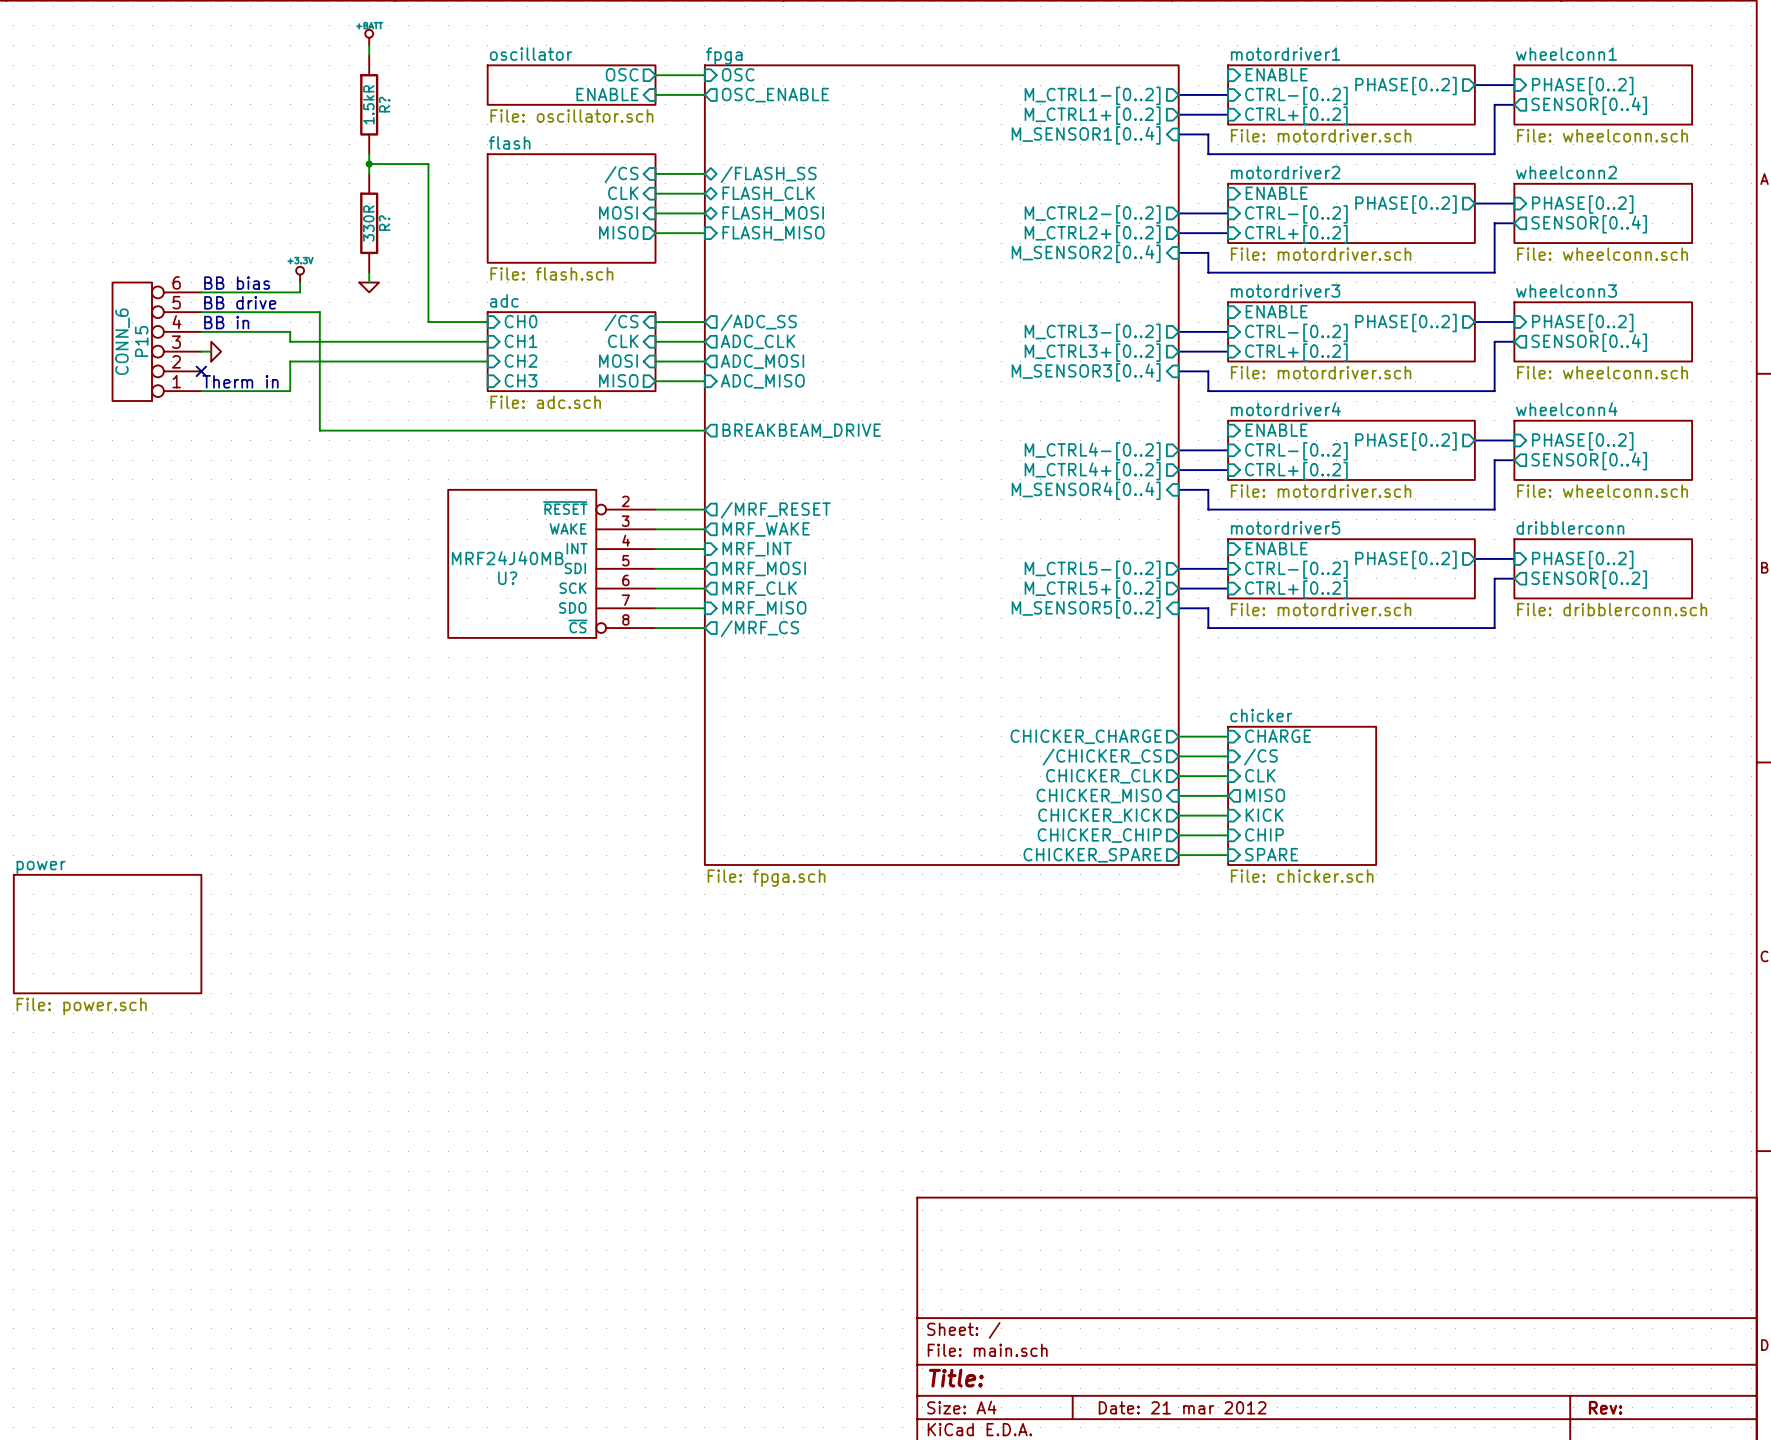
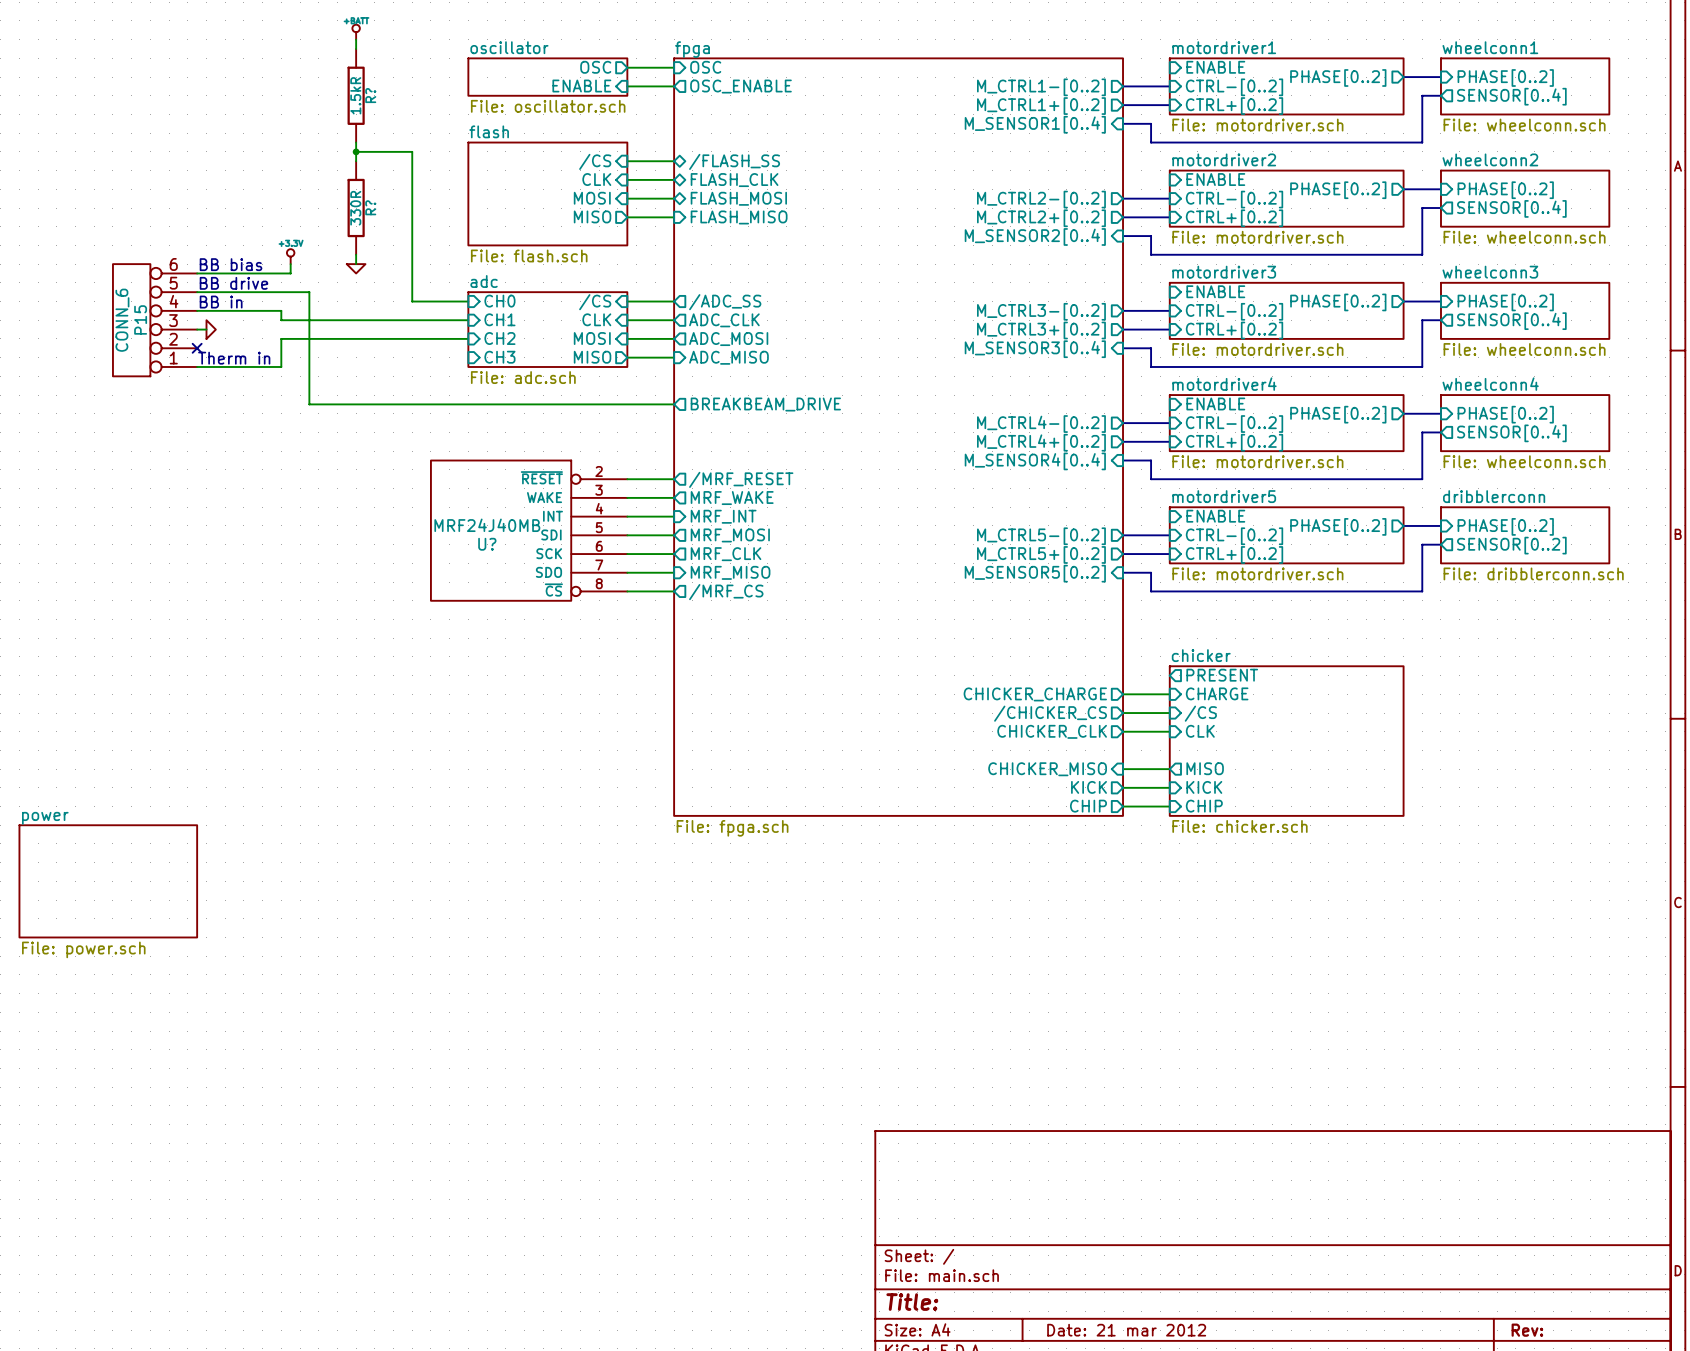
sheet pin: none -> PRESENT (1222, 675)
sheet chicker: none -> File: chicker.sch (1286, 741)
wire: (1178, 795) (1228, 795) -> none
sheet pin: MISO (1265, 795) -> none
sheet chicker: File: chicker.sch (1302, 795) -> none
sheet pin: CHICKER_MISO (1099, 796) -> none
sheet pin shape: output (1099, 815) -> input (1047, 769)
sheet pin: CHICKER_KICK (1099, 815) -> CHICKER_MISO (1047, 769)
sheet pin shape: input (1264, 815) -> output (1205, 768)
sheet pin: KICK (1264, 815) -> MISO (1205, 768)
sheet pin: CHIP (1264, 834) -> KICK (1204, 787)
sheet pin: CHICKER_CHIP (1099, 835) -> KICK (1089, 787)
sheet pin: SPARE (1271, 854) -> CHIP (1204, 806)
sheet pin: CHICKER_SPARE (1092, 855) -> CHIP (1088, 806)

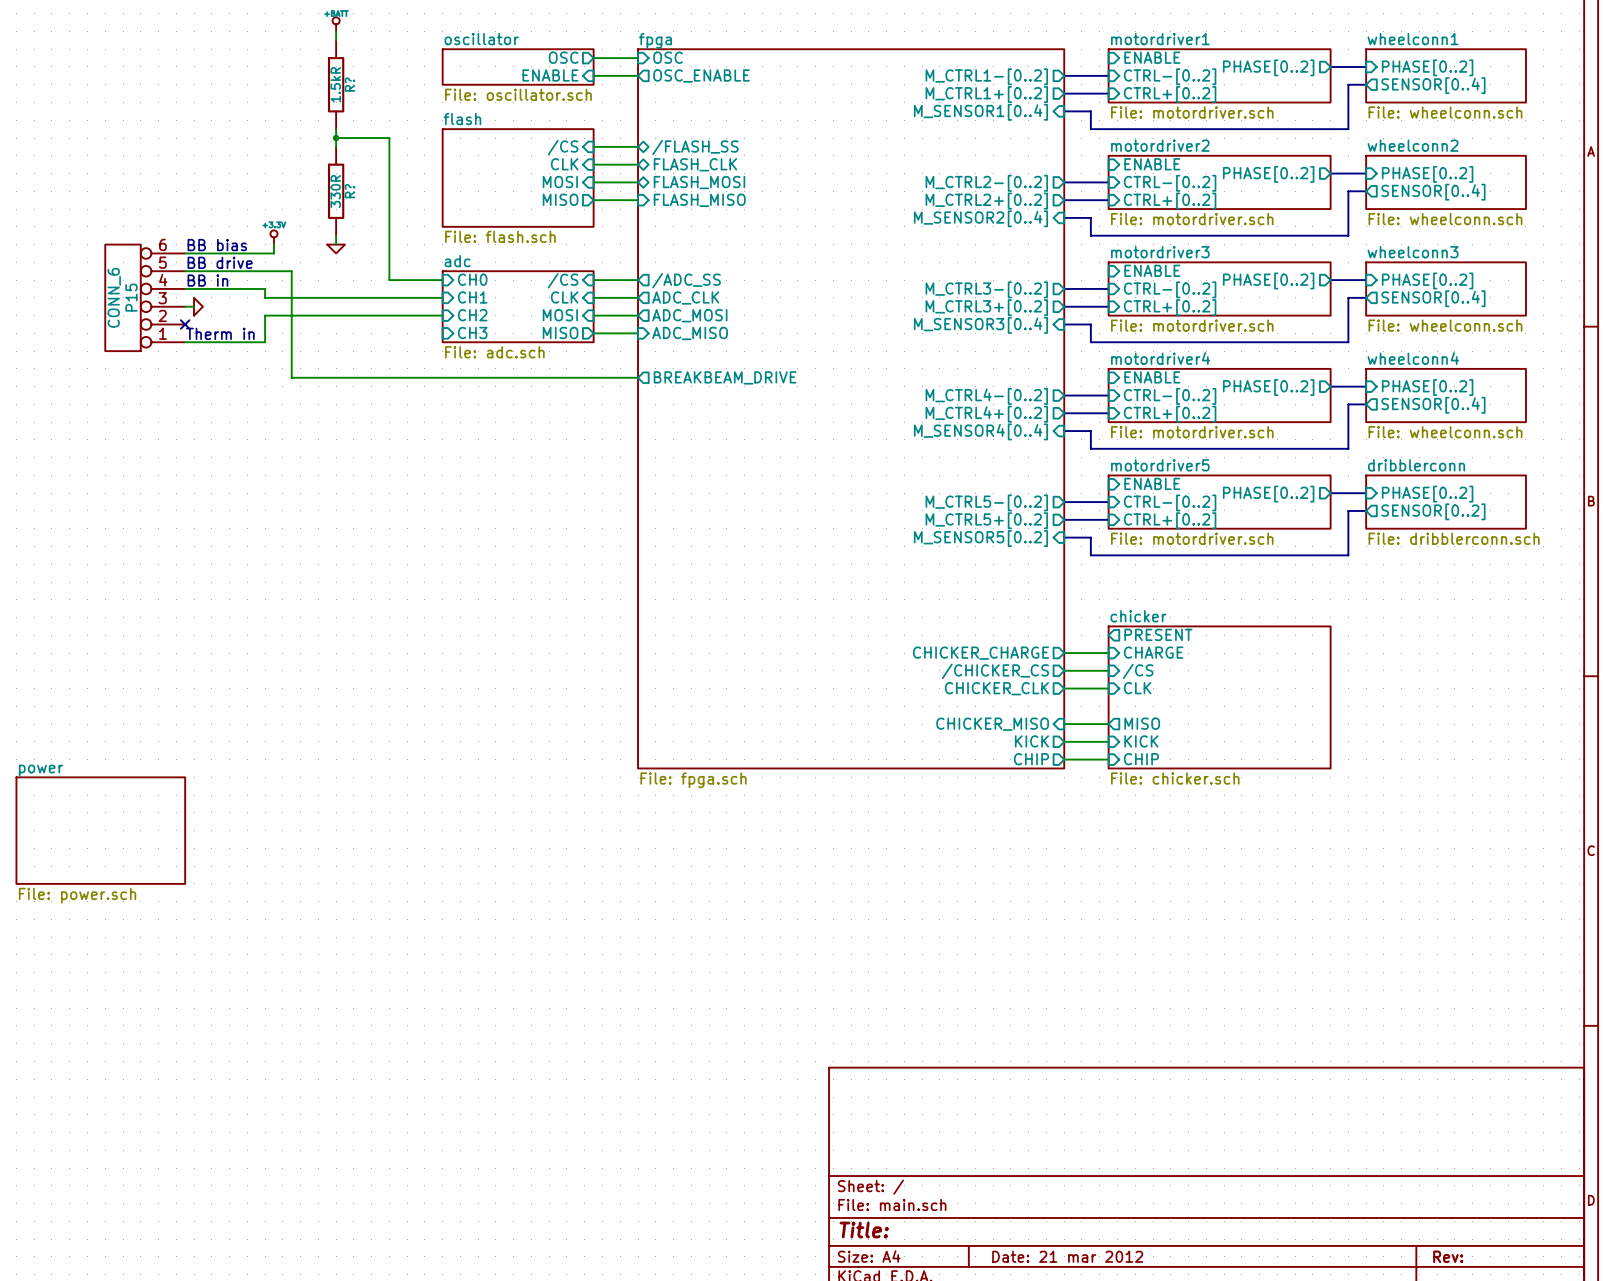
wire: (627, 479) (674, 479) -> none
sheet pin: /MRF_RESET (741, 479) -> none
wire: (627, 497) (674, 497) -> none
sheet pin: MRF_WAKE (732, 498) -> none
wire: (627, 516) (674, 516) -> none
sheet pin: MRF_INT (723, 516) -> none
U?: MRF24J40MB (529, 530) -> none
wire: (627, 535) (674, 535) -> none
sheet pin: MRF_MOSI (730, 535) -> none
wire: (627, 554) (674, 554) -> none
sheet pin: MRF_CLK (726, 554) -> none
wire: (627, 572) (674, 572) -> none
sheet pin: MRF_MISO (730, 572) -> none
wire: (627, 591) (674, 591) -> none
sheet pin: /MRF_CS (726, 592) -> none

